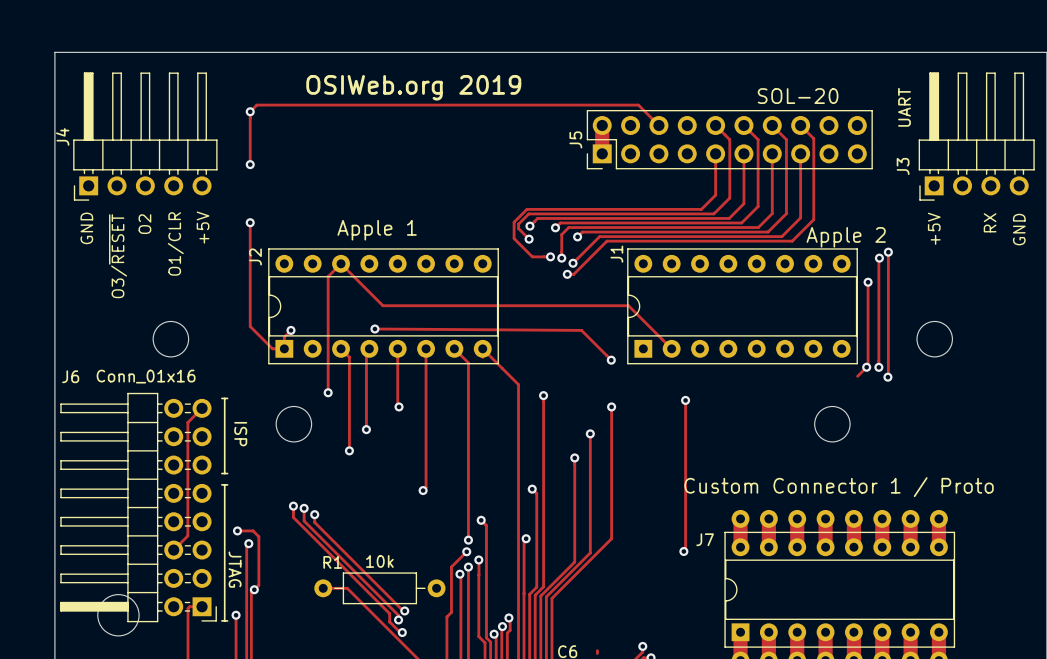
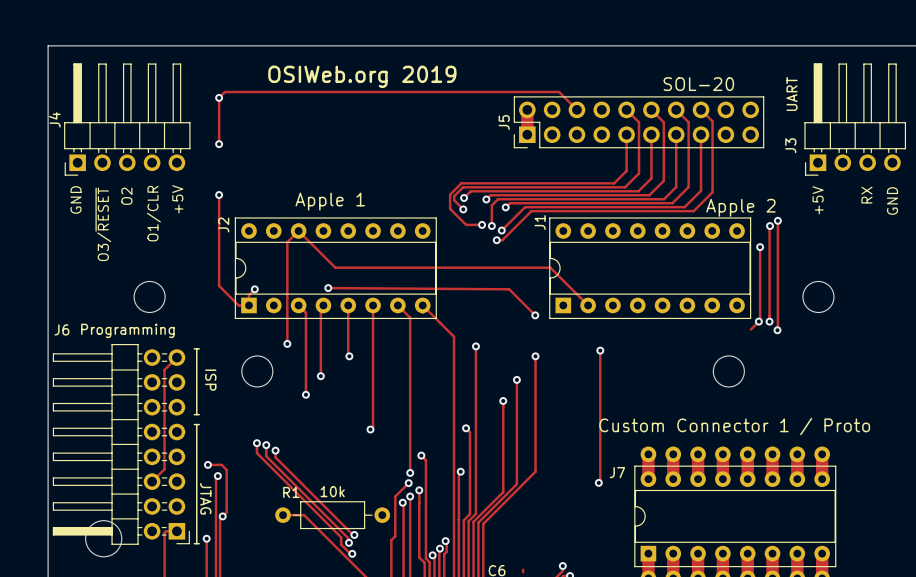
J6 value: Conn_01x16 (146, 376) -> Programming (127, 330)

